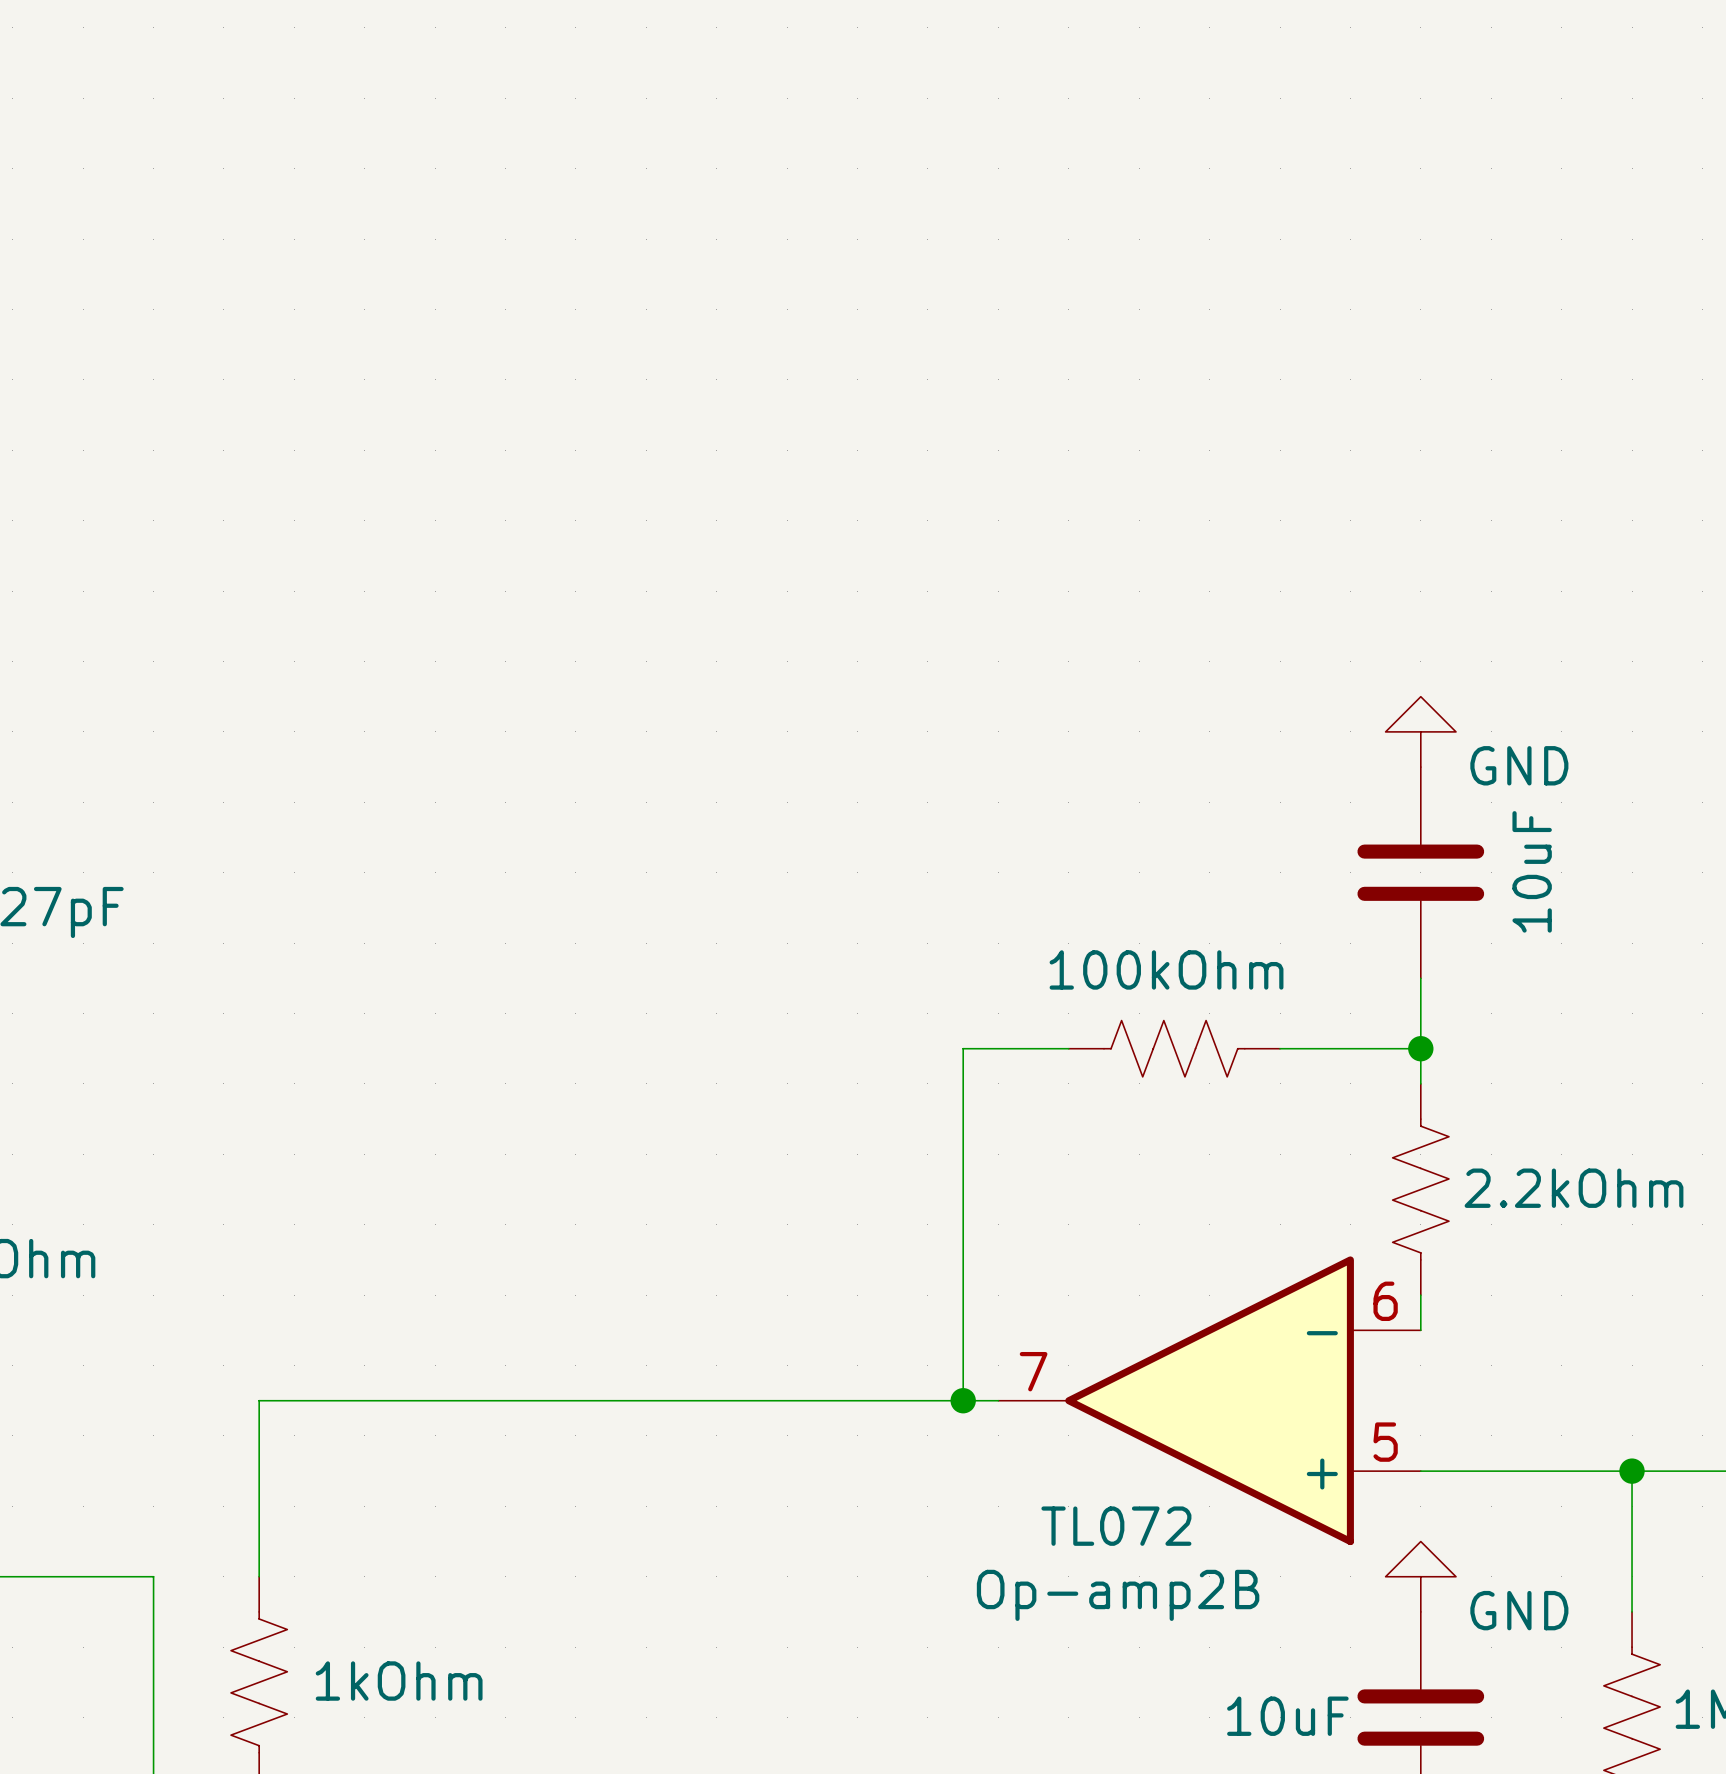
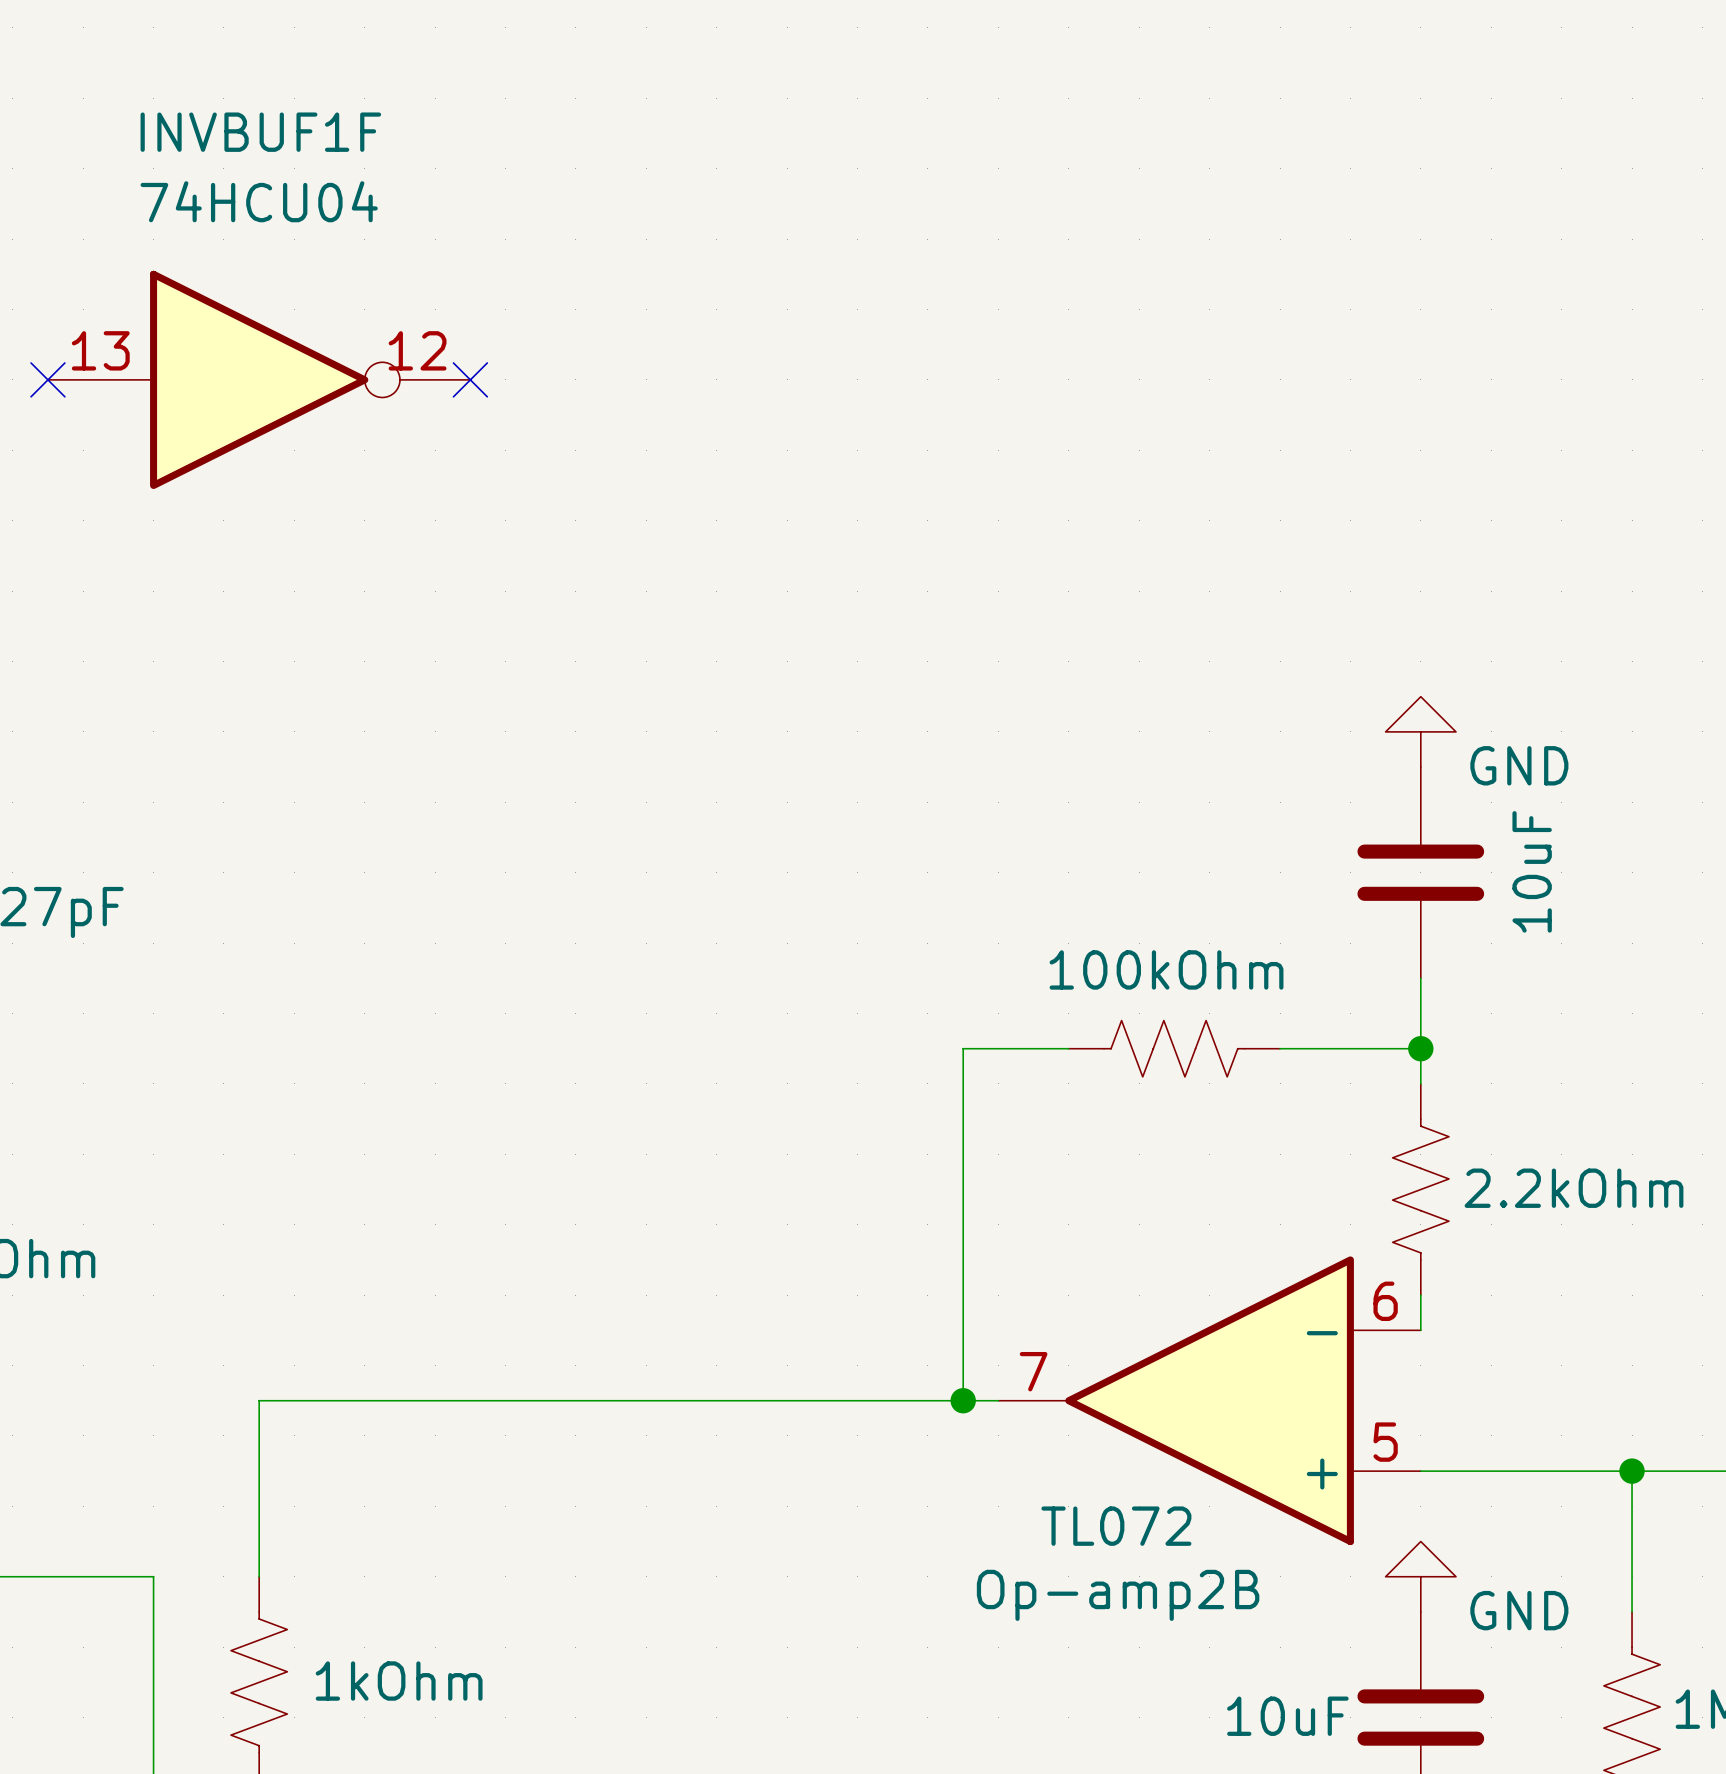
no-connect mark: none -> (47, 379)
INVBUF1F: none -> 74HCU04 (259, 379)
no-connect mark: none -> (470, 379)

